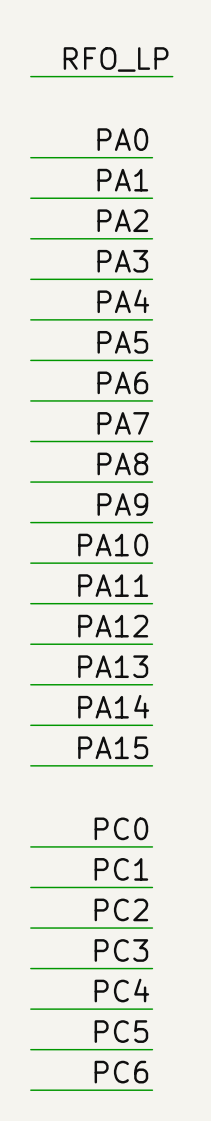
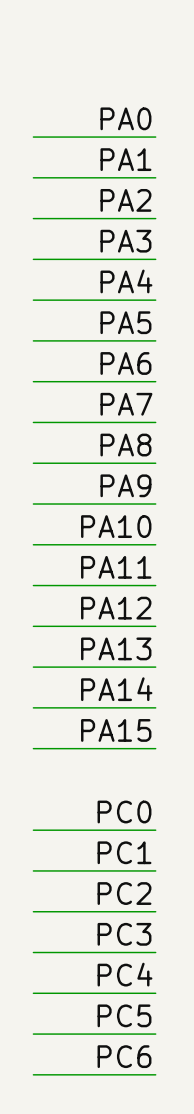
label: RFO_LP (116, 59) -> none
wire: (30, 76) (172, 76) -> none

